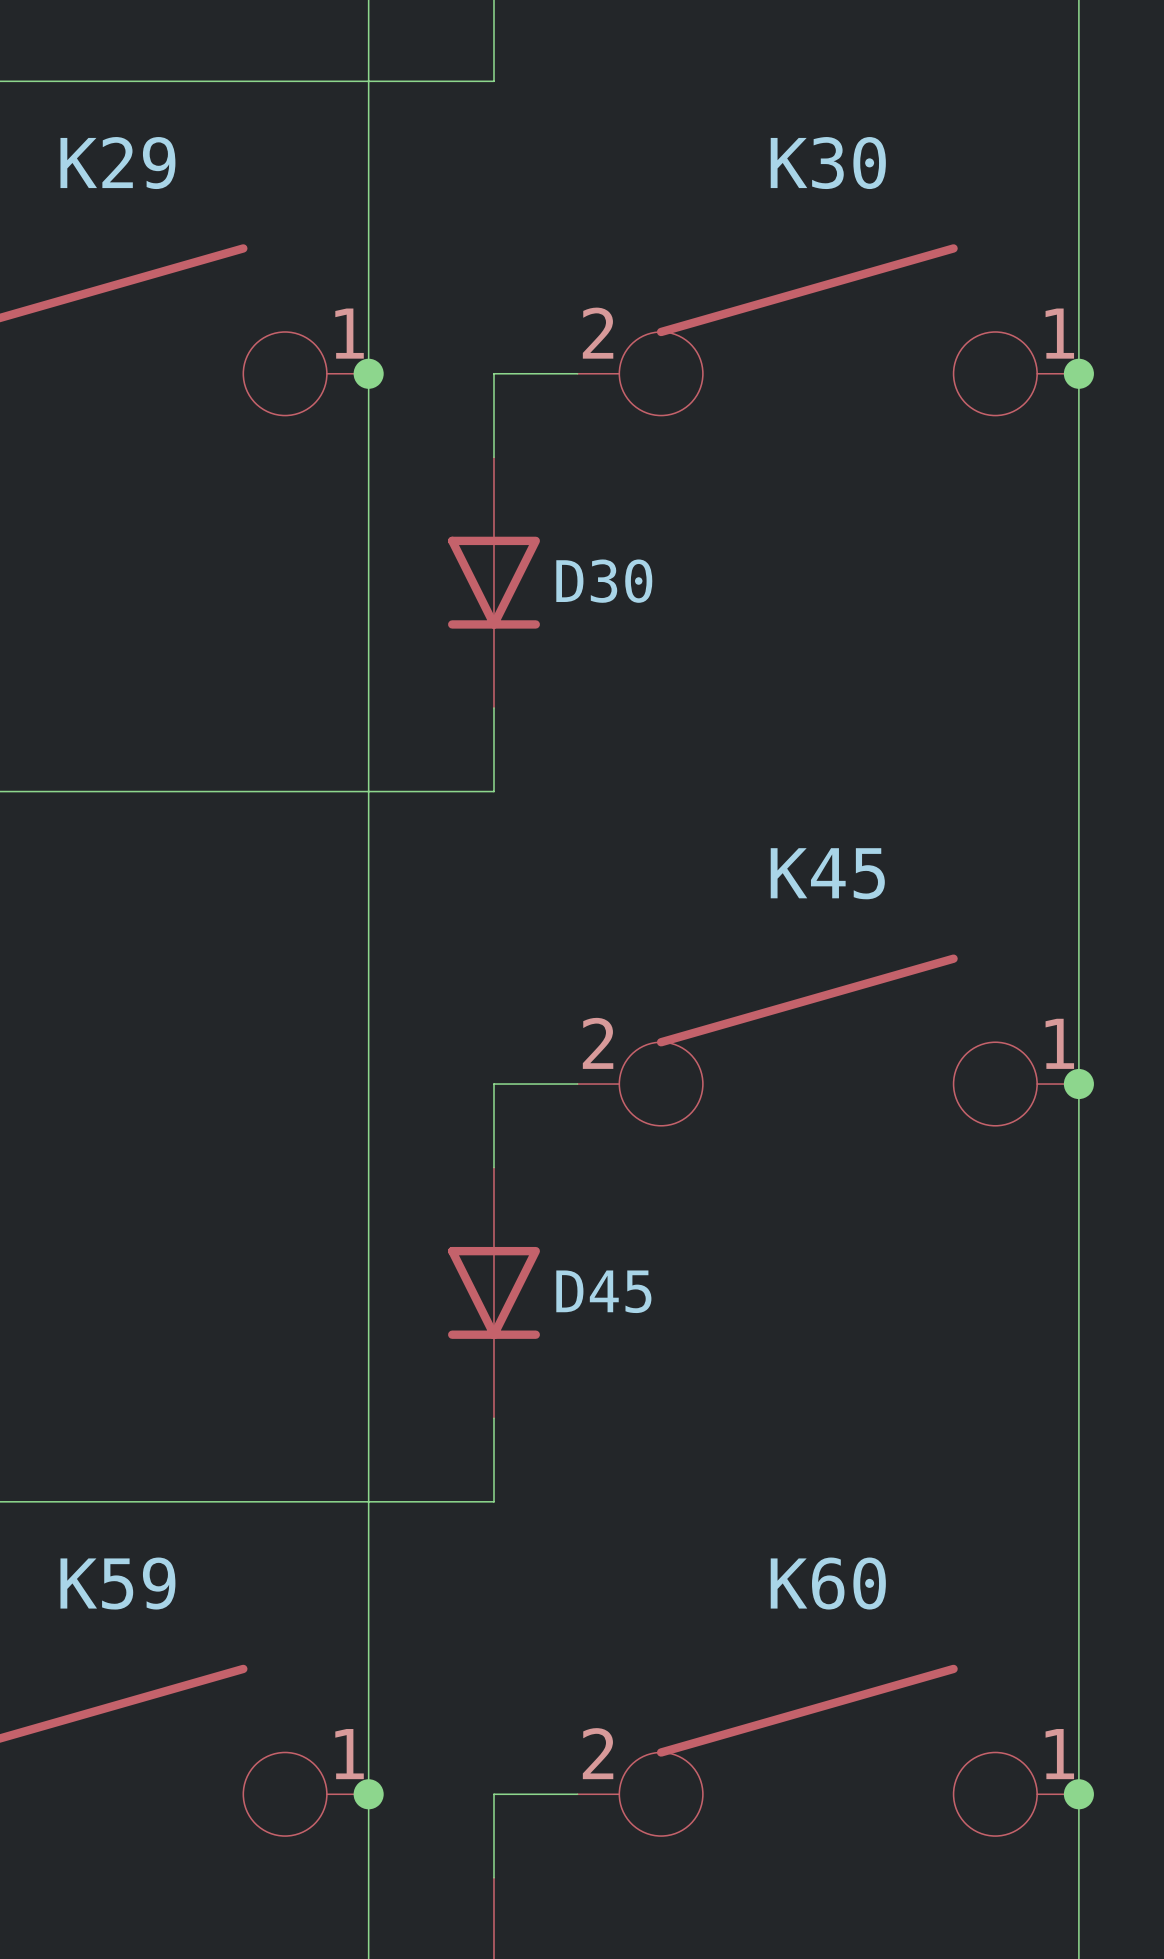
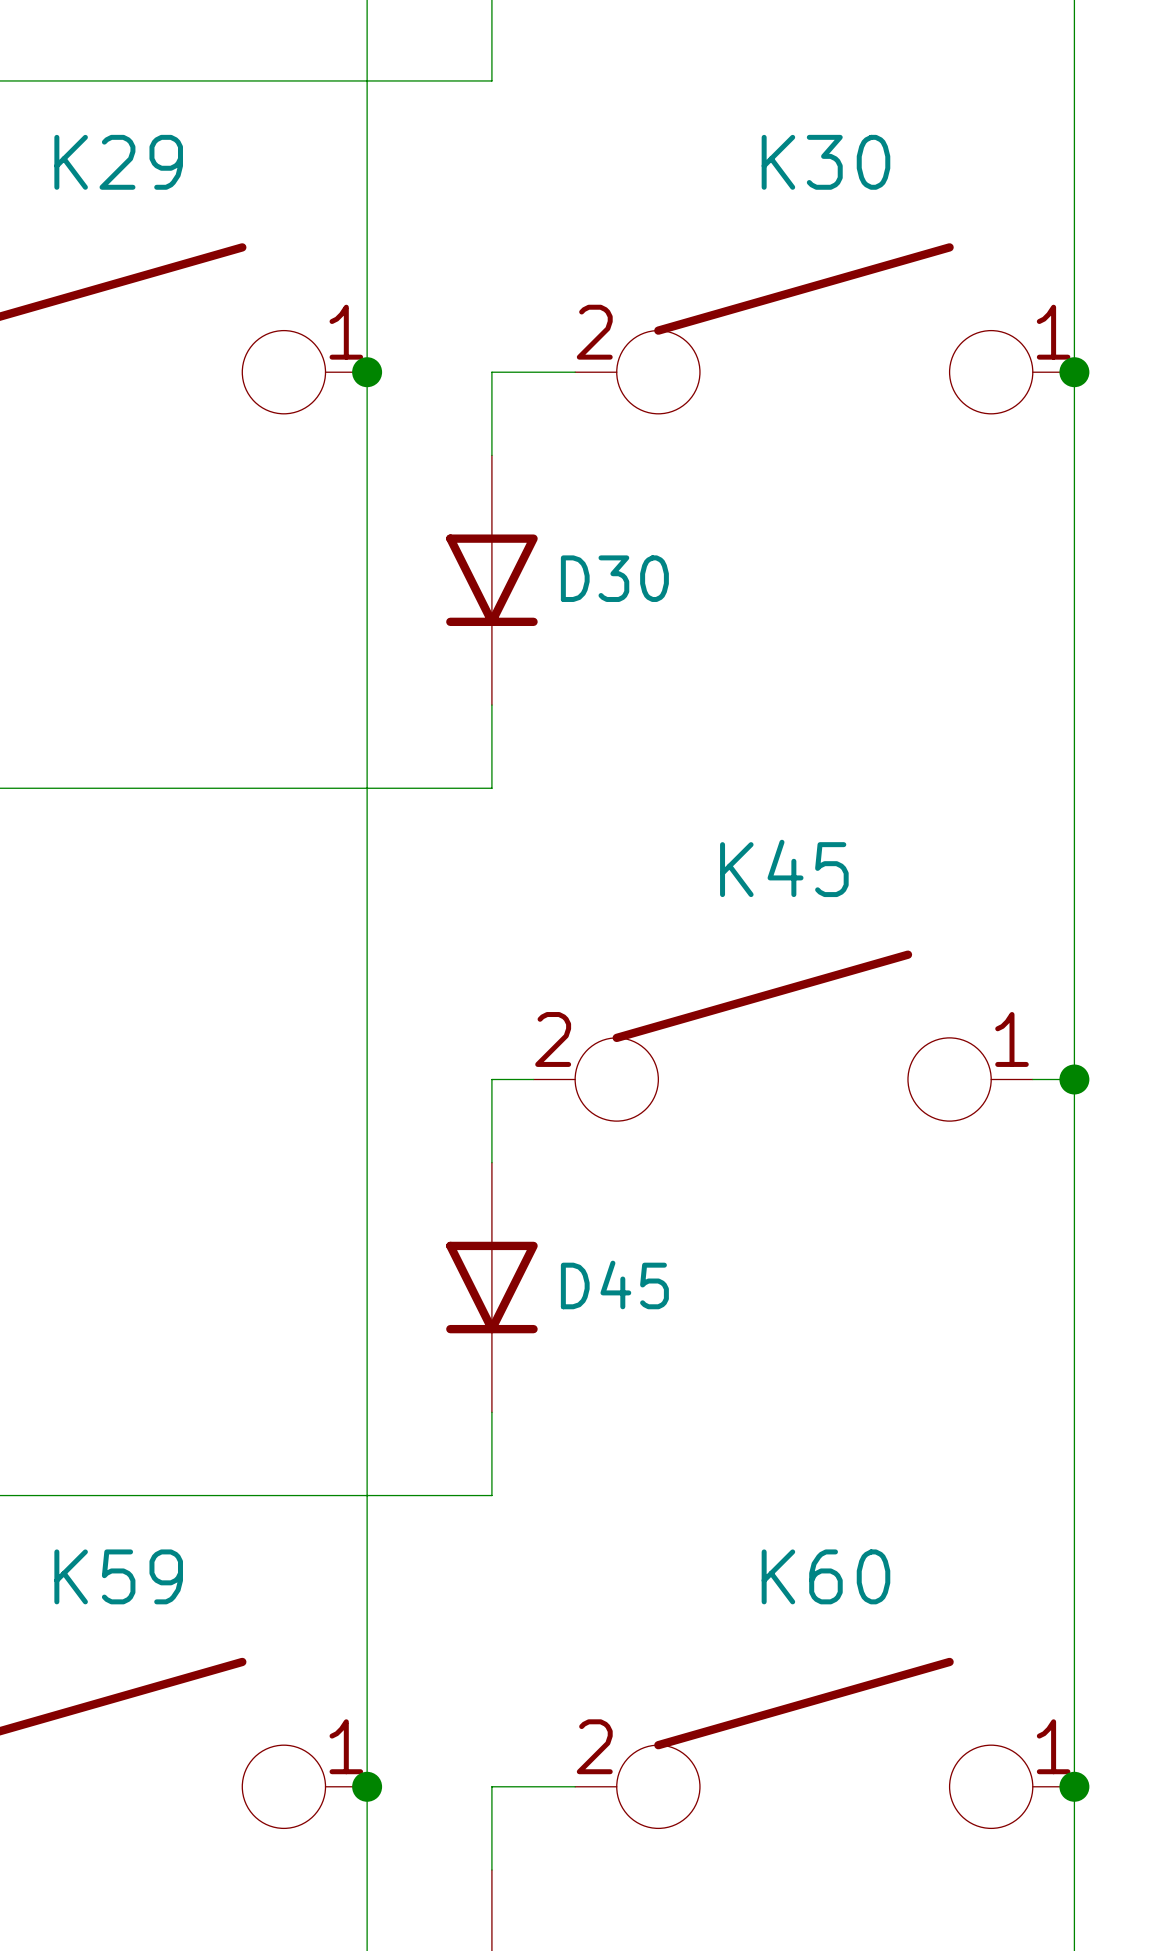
K45 position: (828, 1040) -> (783, 1035)

